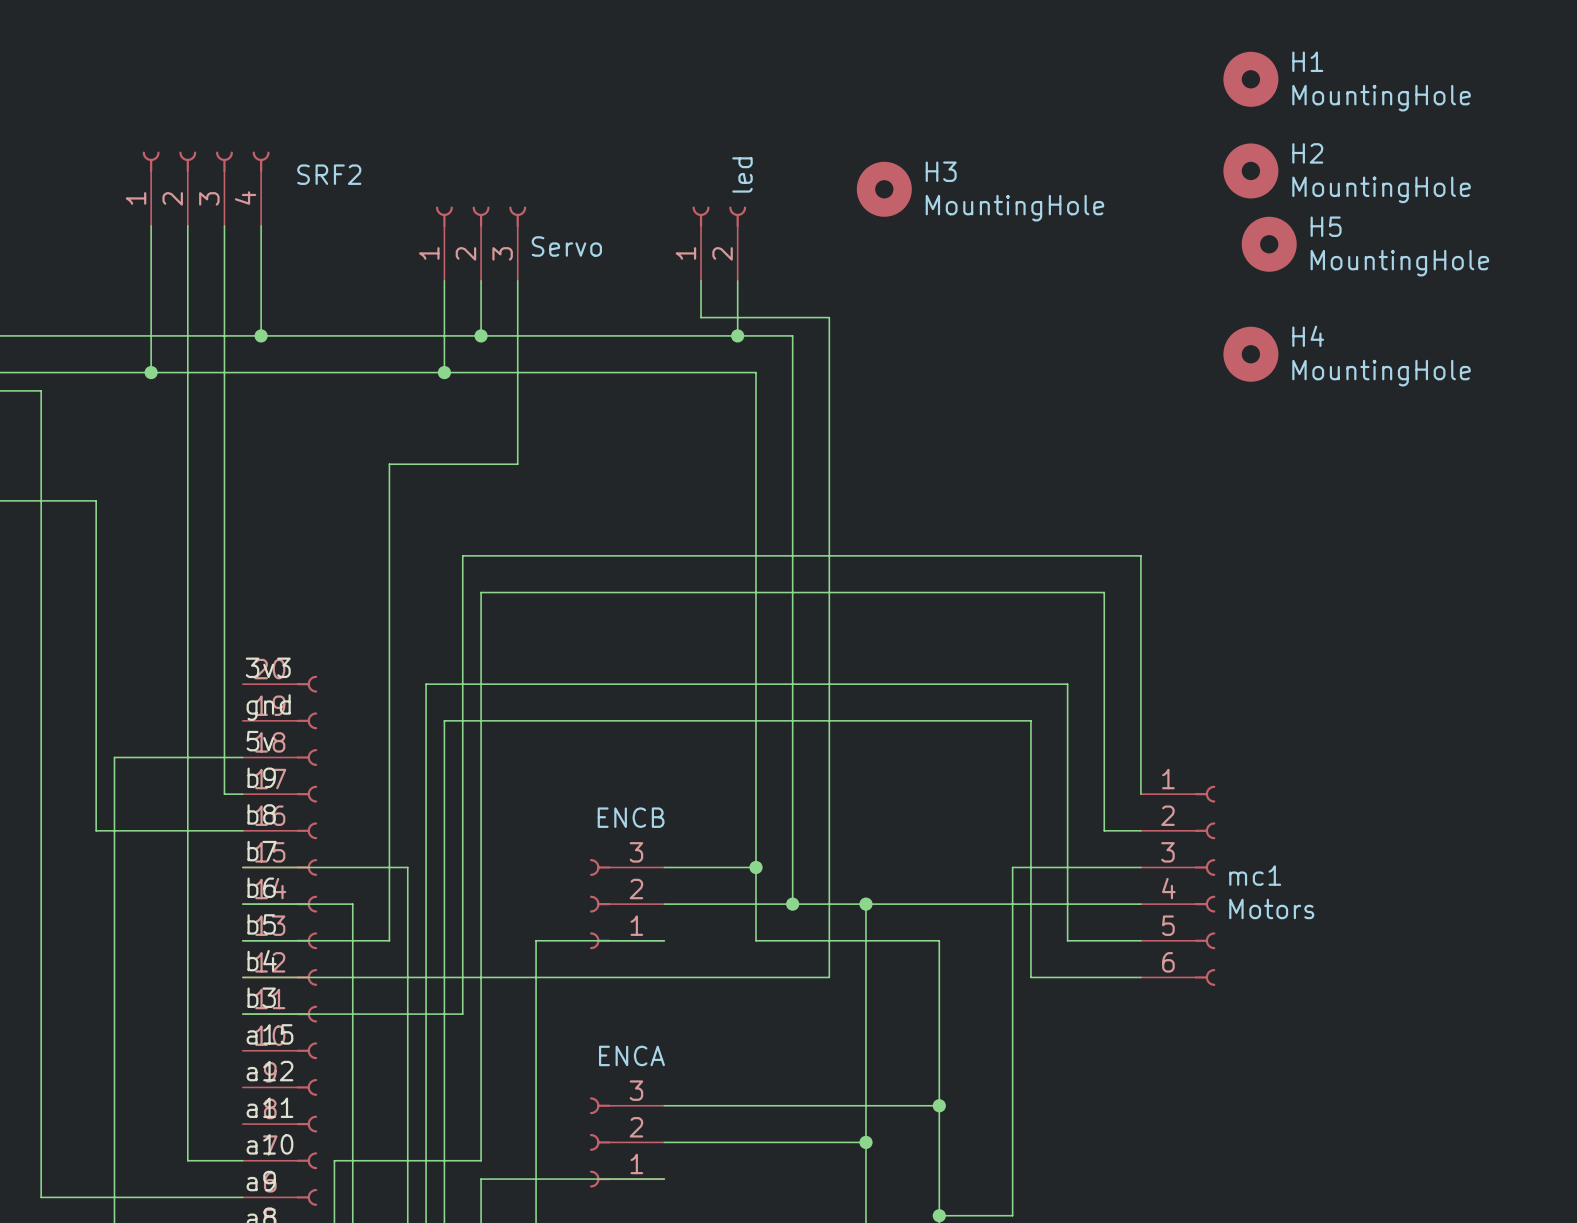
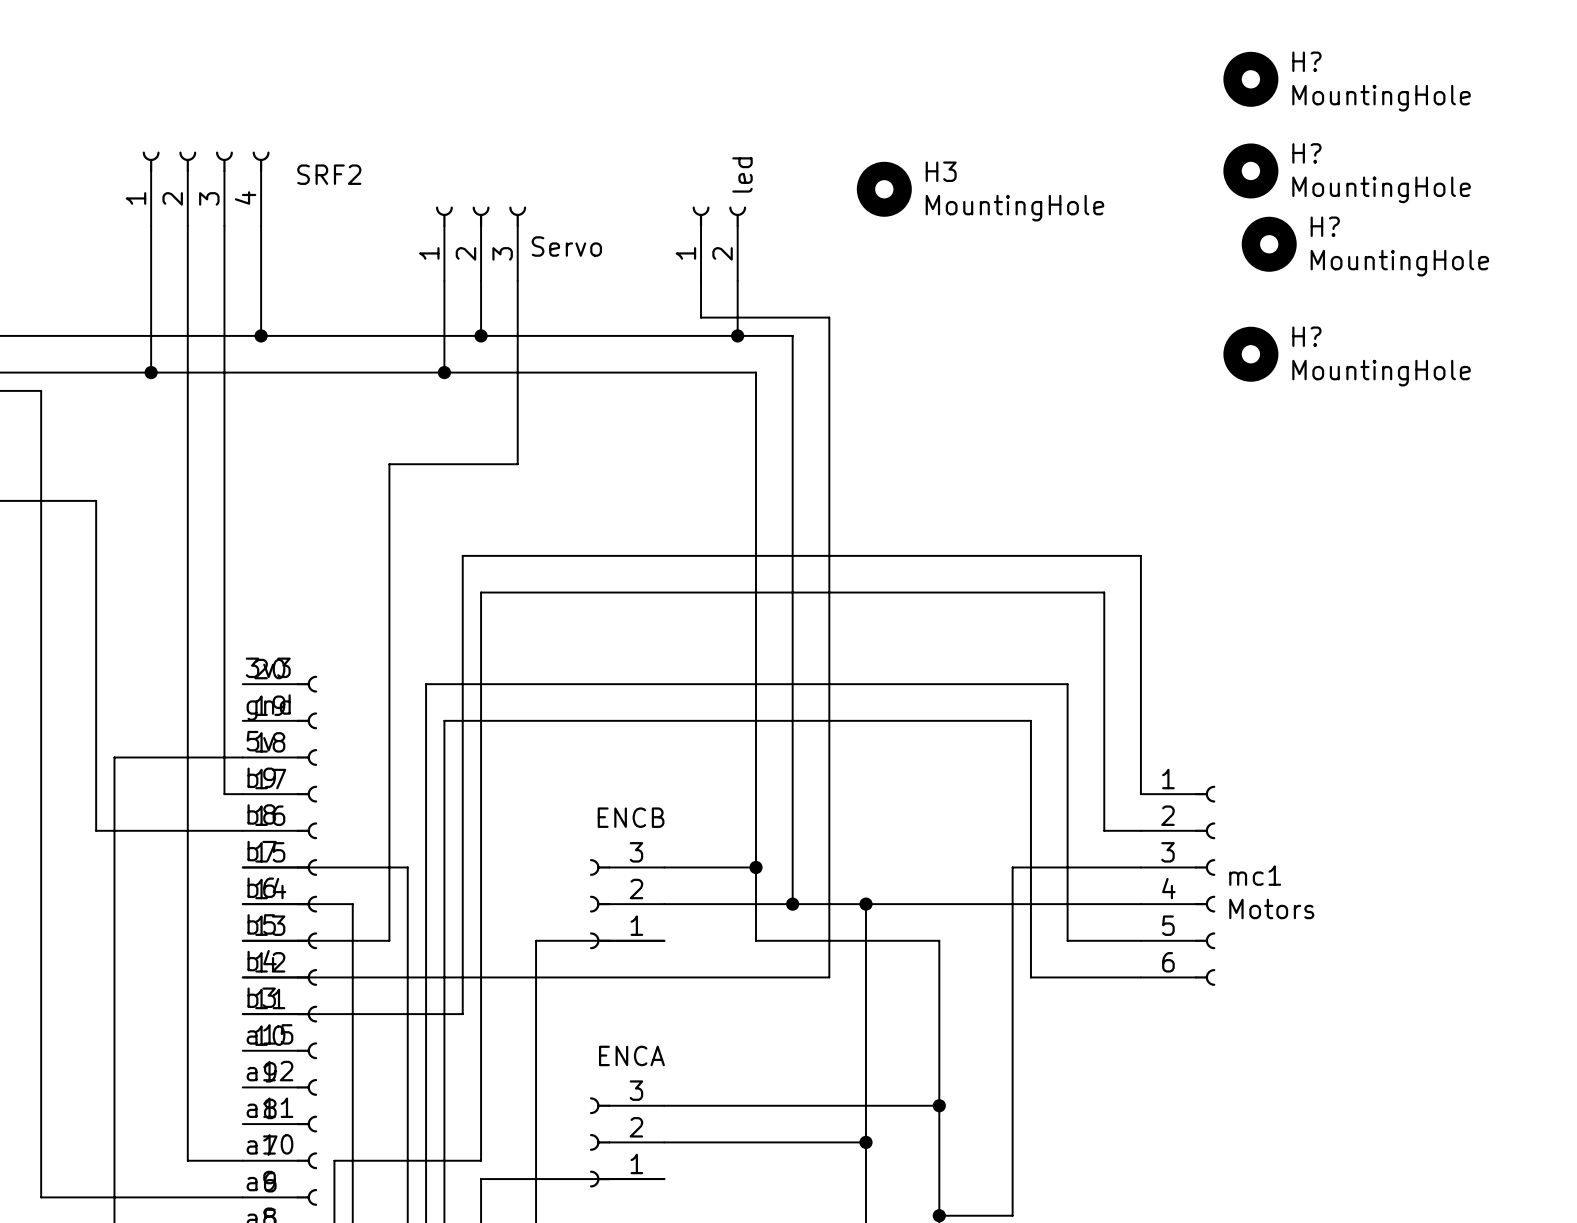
H1 name: H1 (1307, 61) -> H? (1306, 61)
H2 name: H2 (1307, 153) -> H? (1306, 153)
H5 name: H5 (1326, 226) -> H? (1325, 226)
H4 name: H4 (1308, 336) -> H? (1306, 336)

